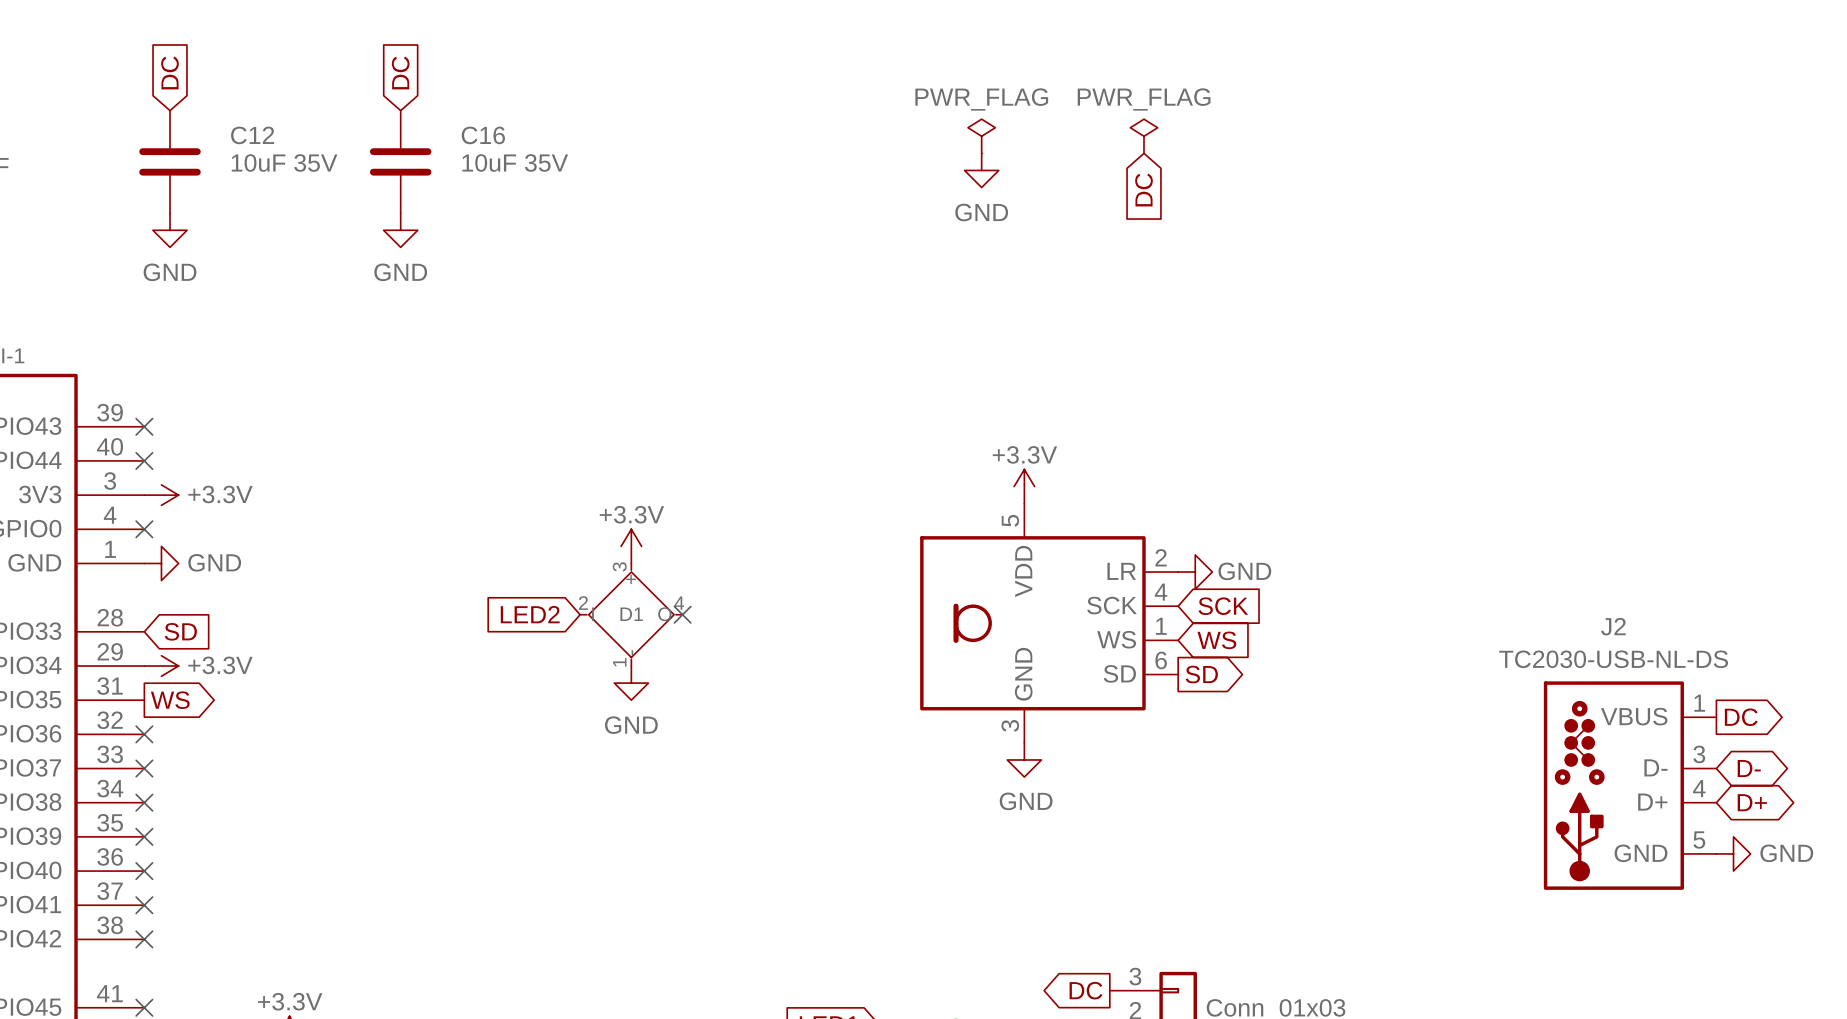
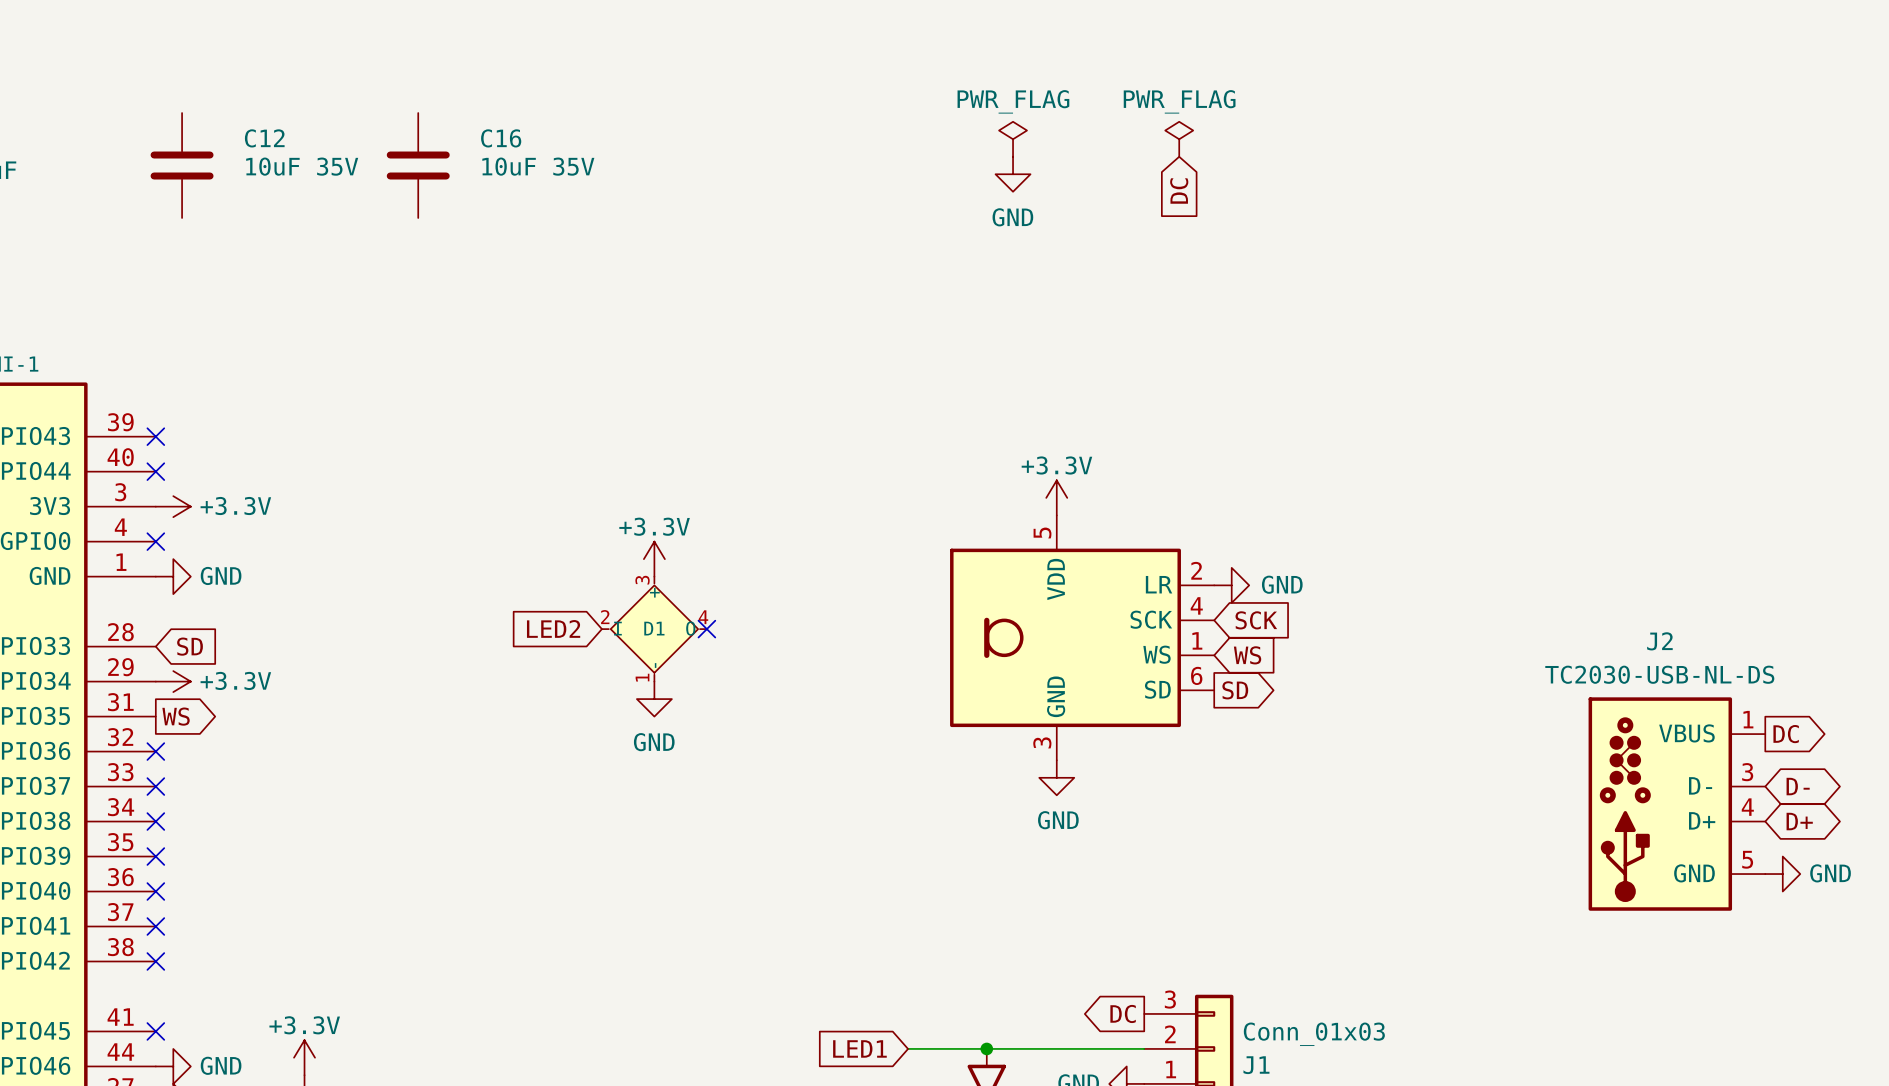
global label: DC (169, 72) -> none
global label: DC (400, 72) -> none
power symbol: GND (170, 230) -> none
power symbol: GND (400, 230) -> none

